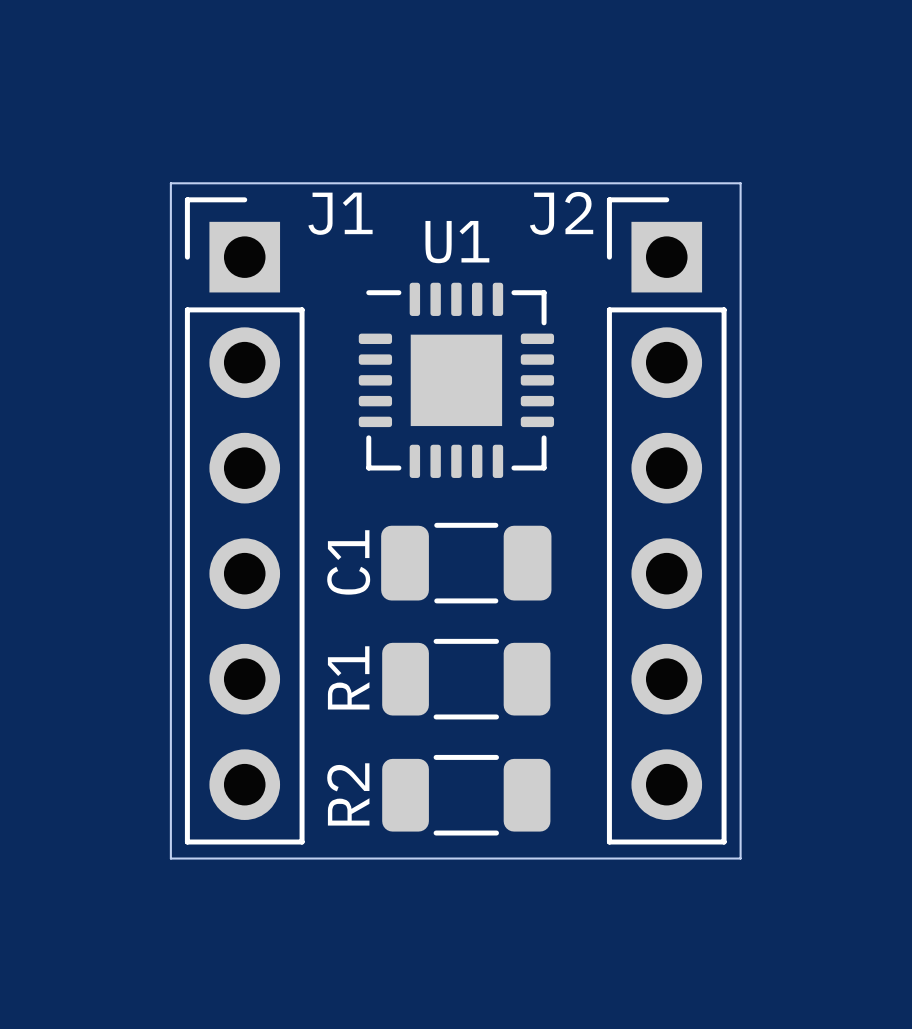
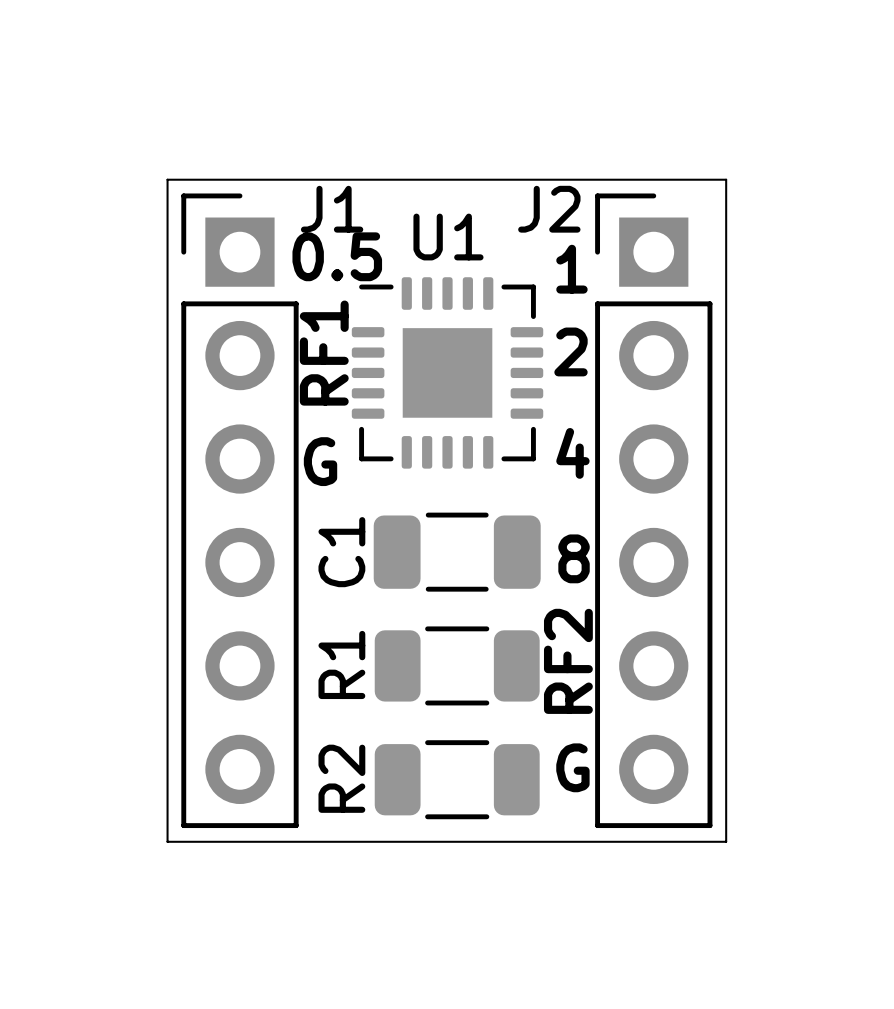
text: none -> 0.5 (337, 256)
text: none -> 1 (571, 269)
text: none -> 2 (570, 351)
text: none -> RF1 (324, 353)
text: none -> 4 (572, 453)
text: none -> G (320, 461)
text: none -> 8 (574, 558)
text: none -> RF2 (568, 661)
text: none -> G (572, 767)

